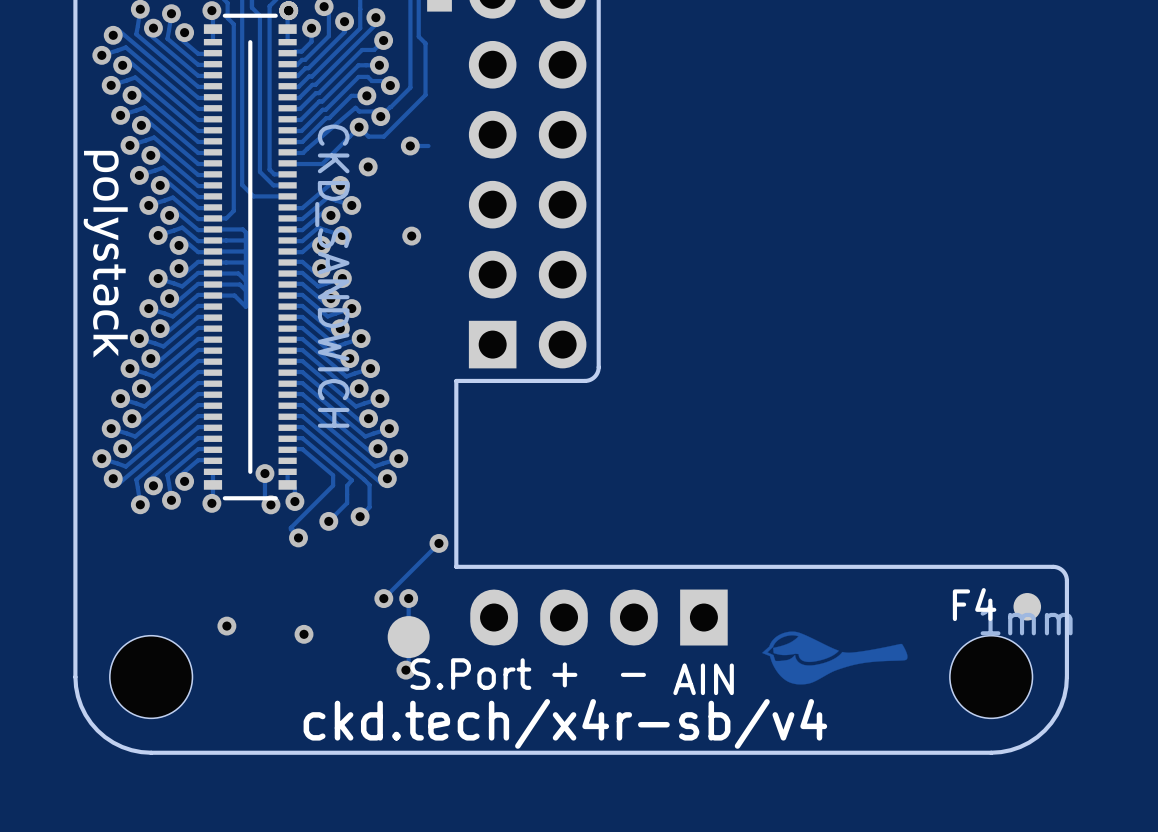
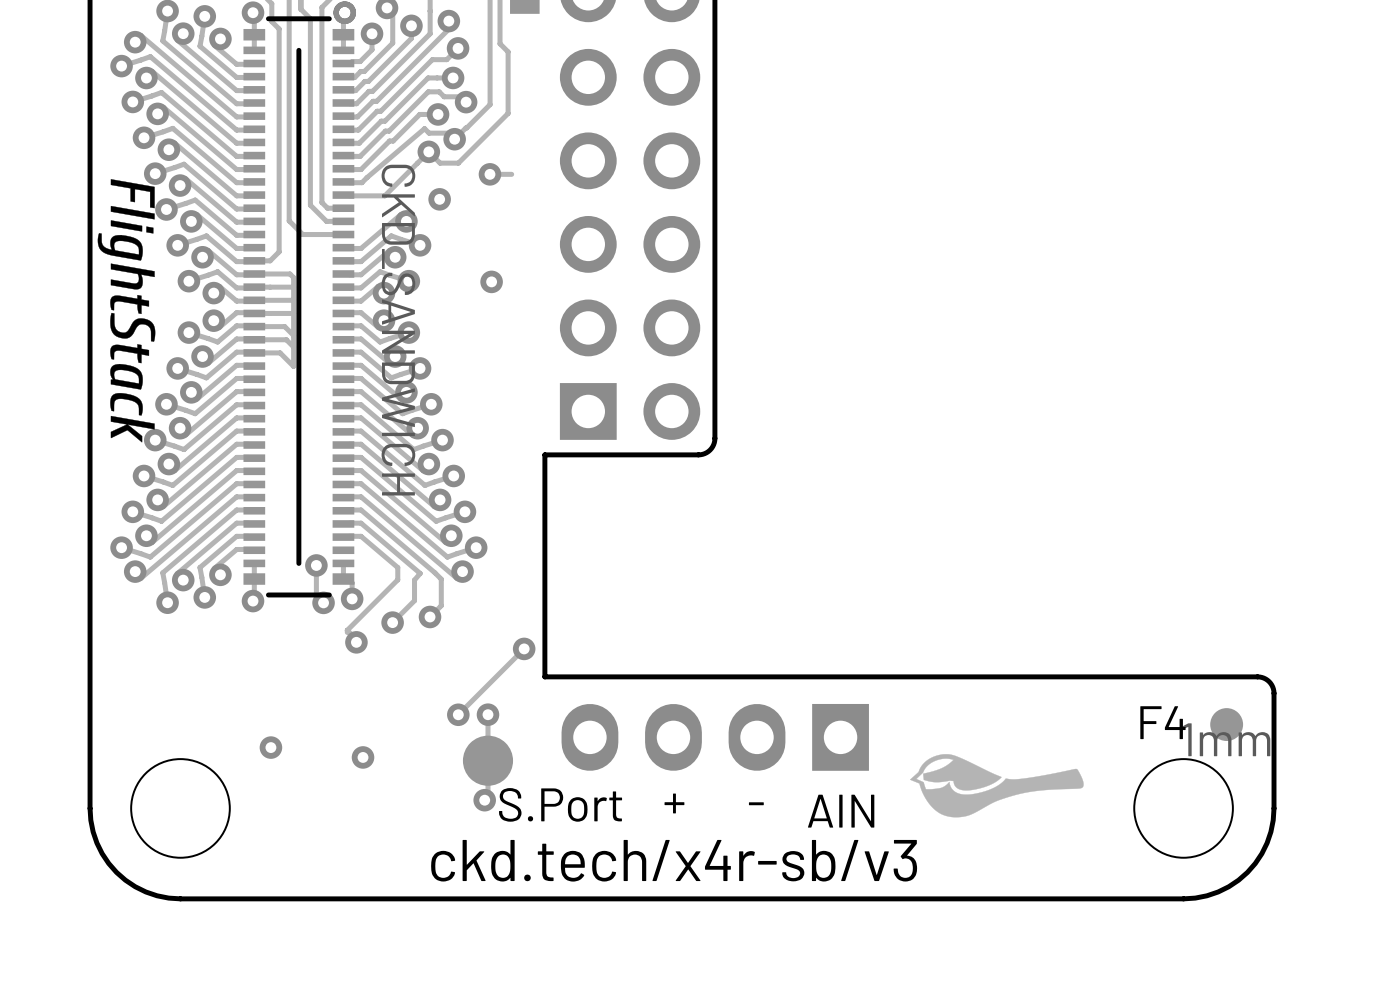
drawing shape: [83, 150, 128, 358] -> [97, 179, 156, 443]
text: ckd.tech/x4r-sb/v4 (565, 723) -> ckd.tech/x4r-sb/v3 (674, 860)

